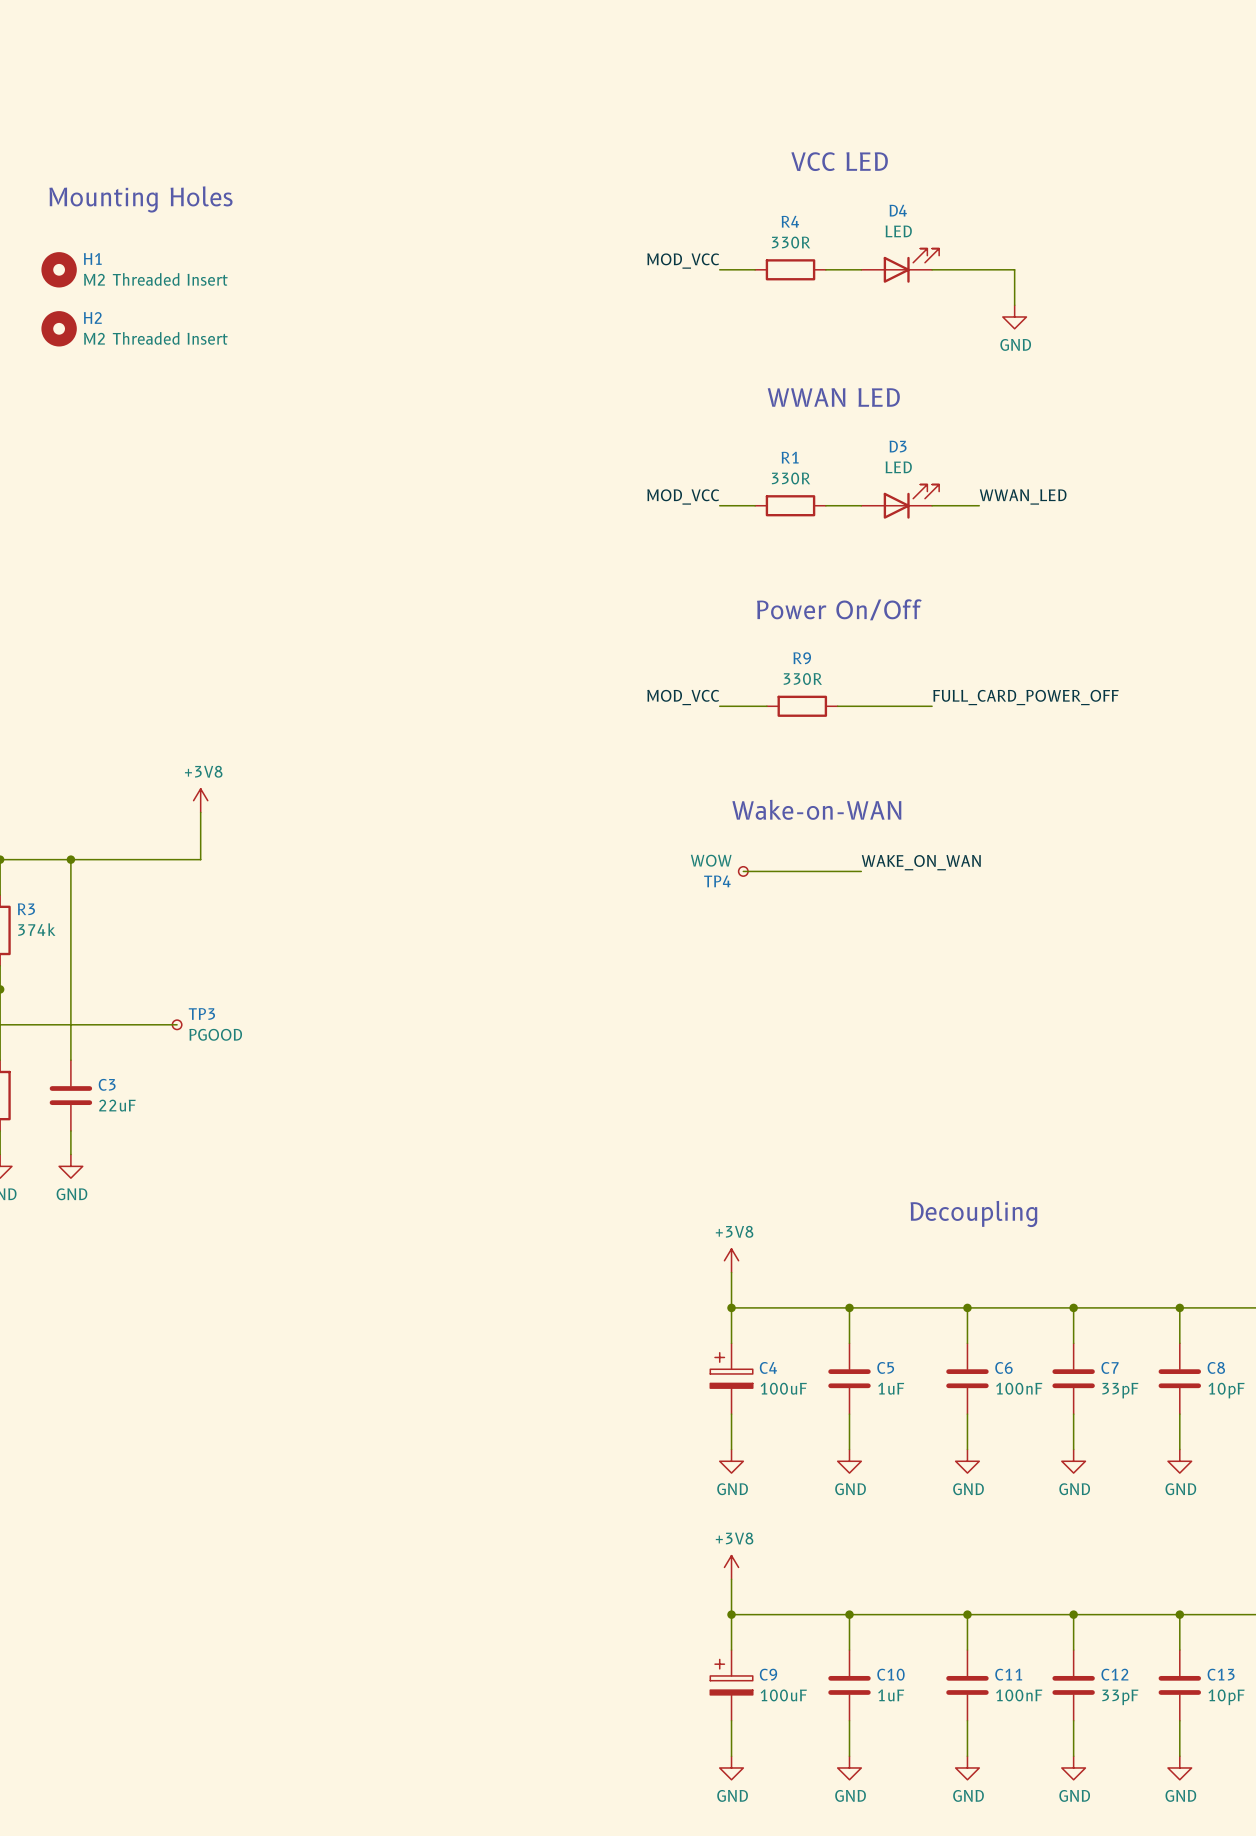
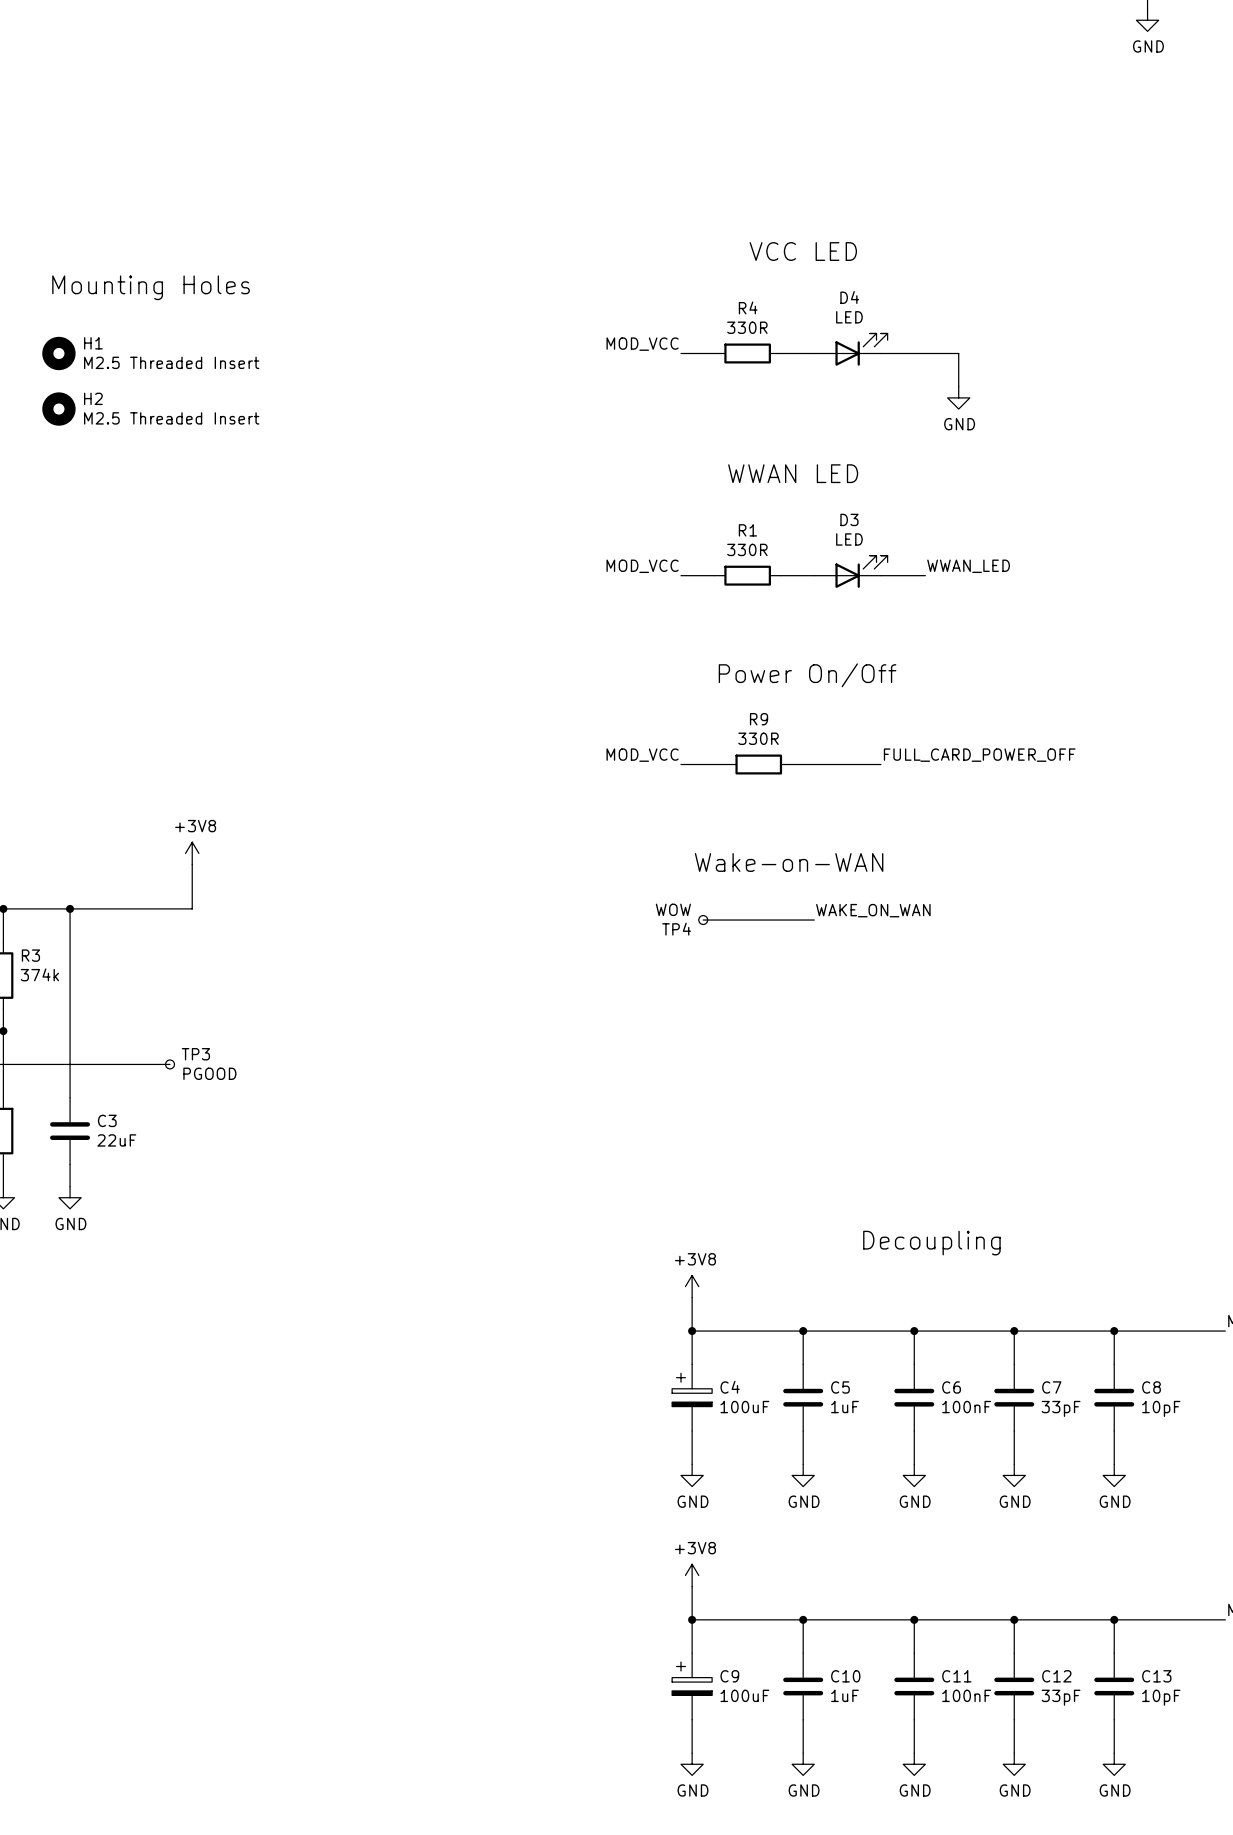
H1 value: M2 Threaded Insert (155, 279) -> M2.5 Threaded Insert (171, 362)
H2 value: M2 Threaded Insert (155, 338) -> M2.5 Threaded Insert (171, 418)

